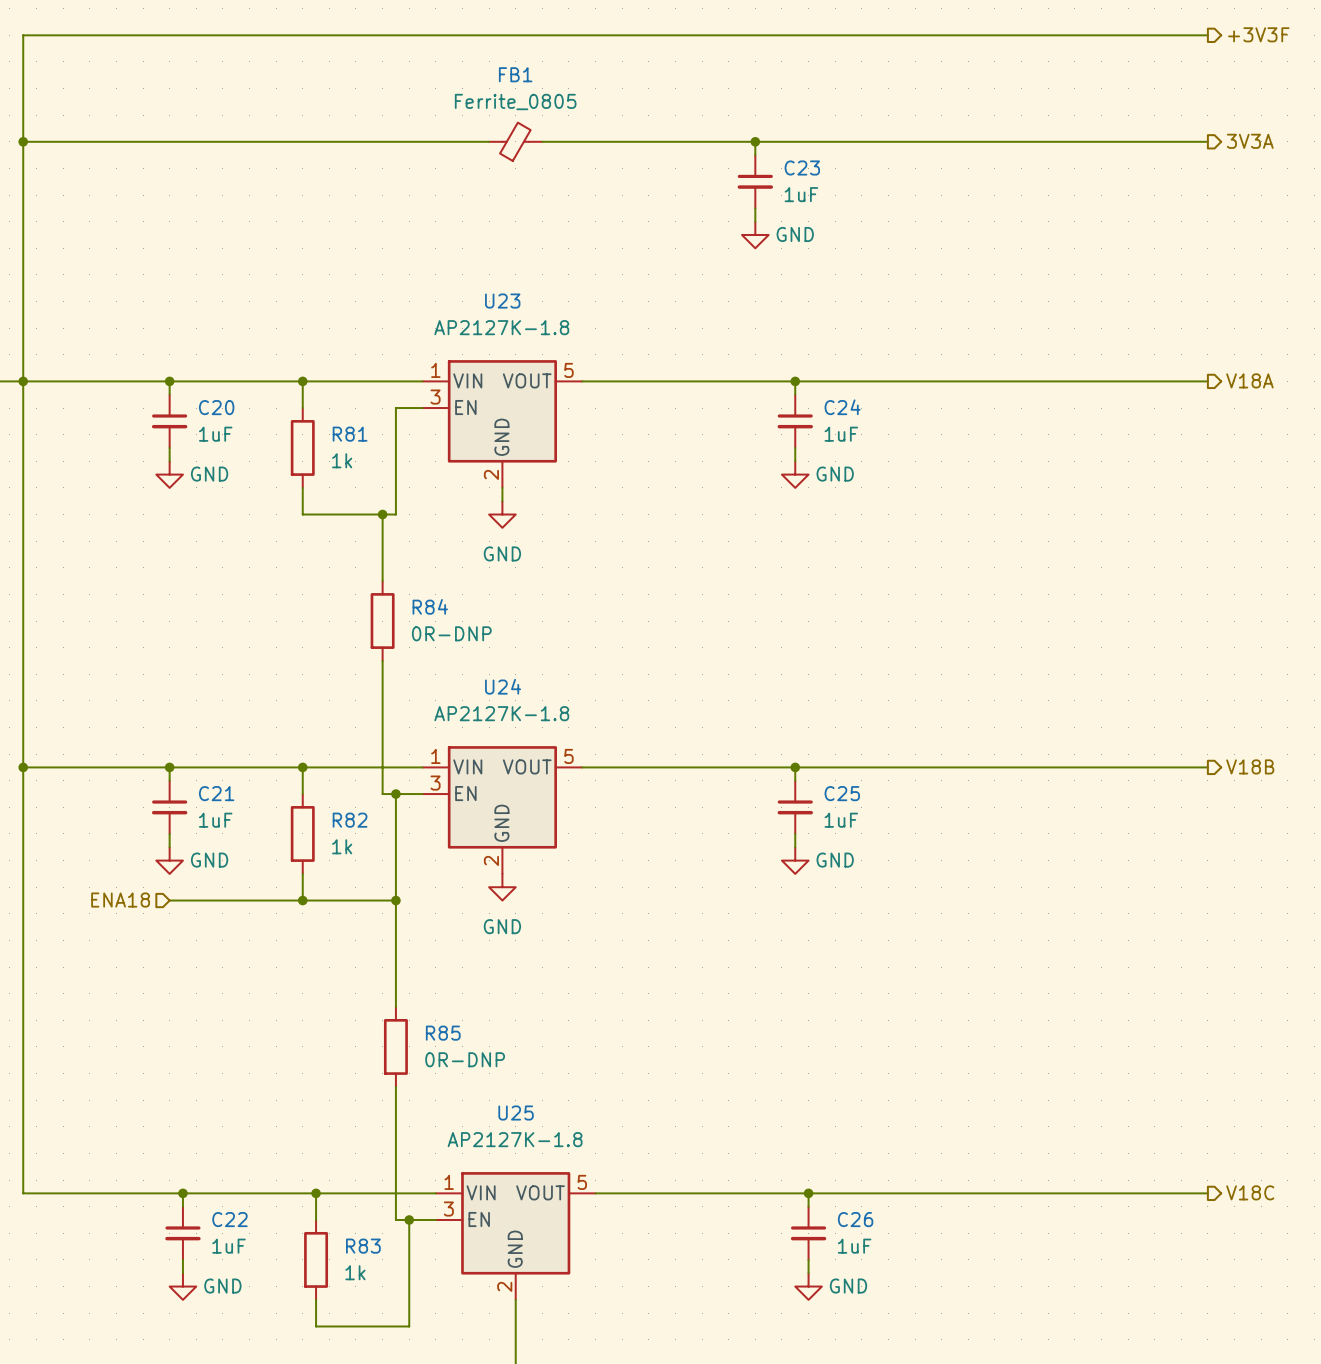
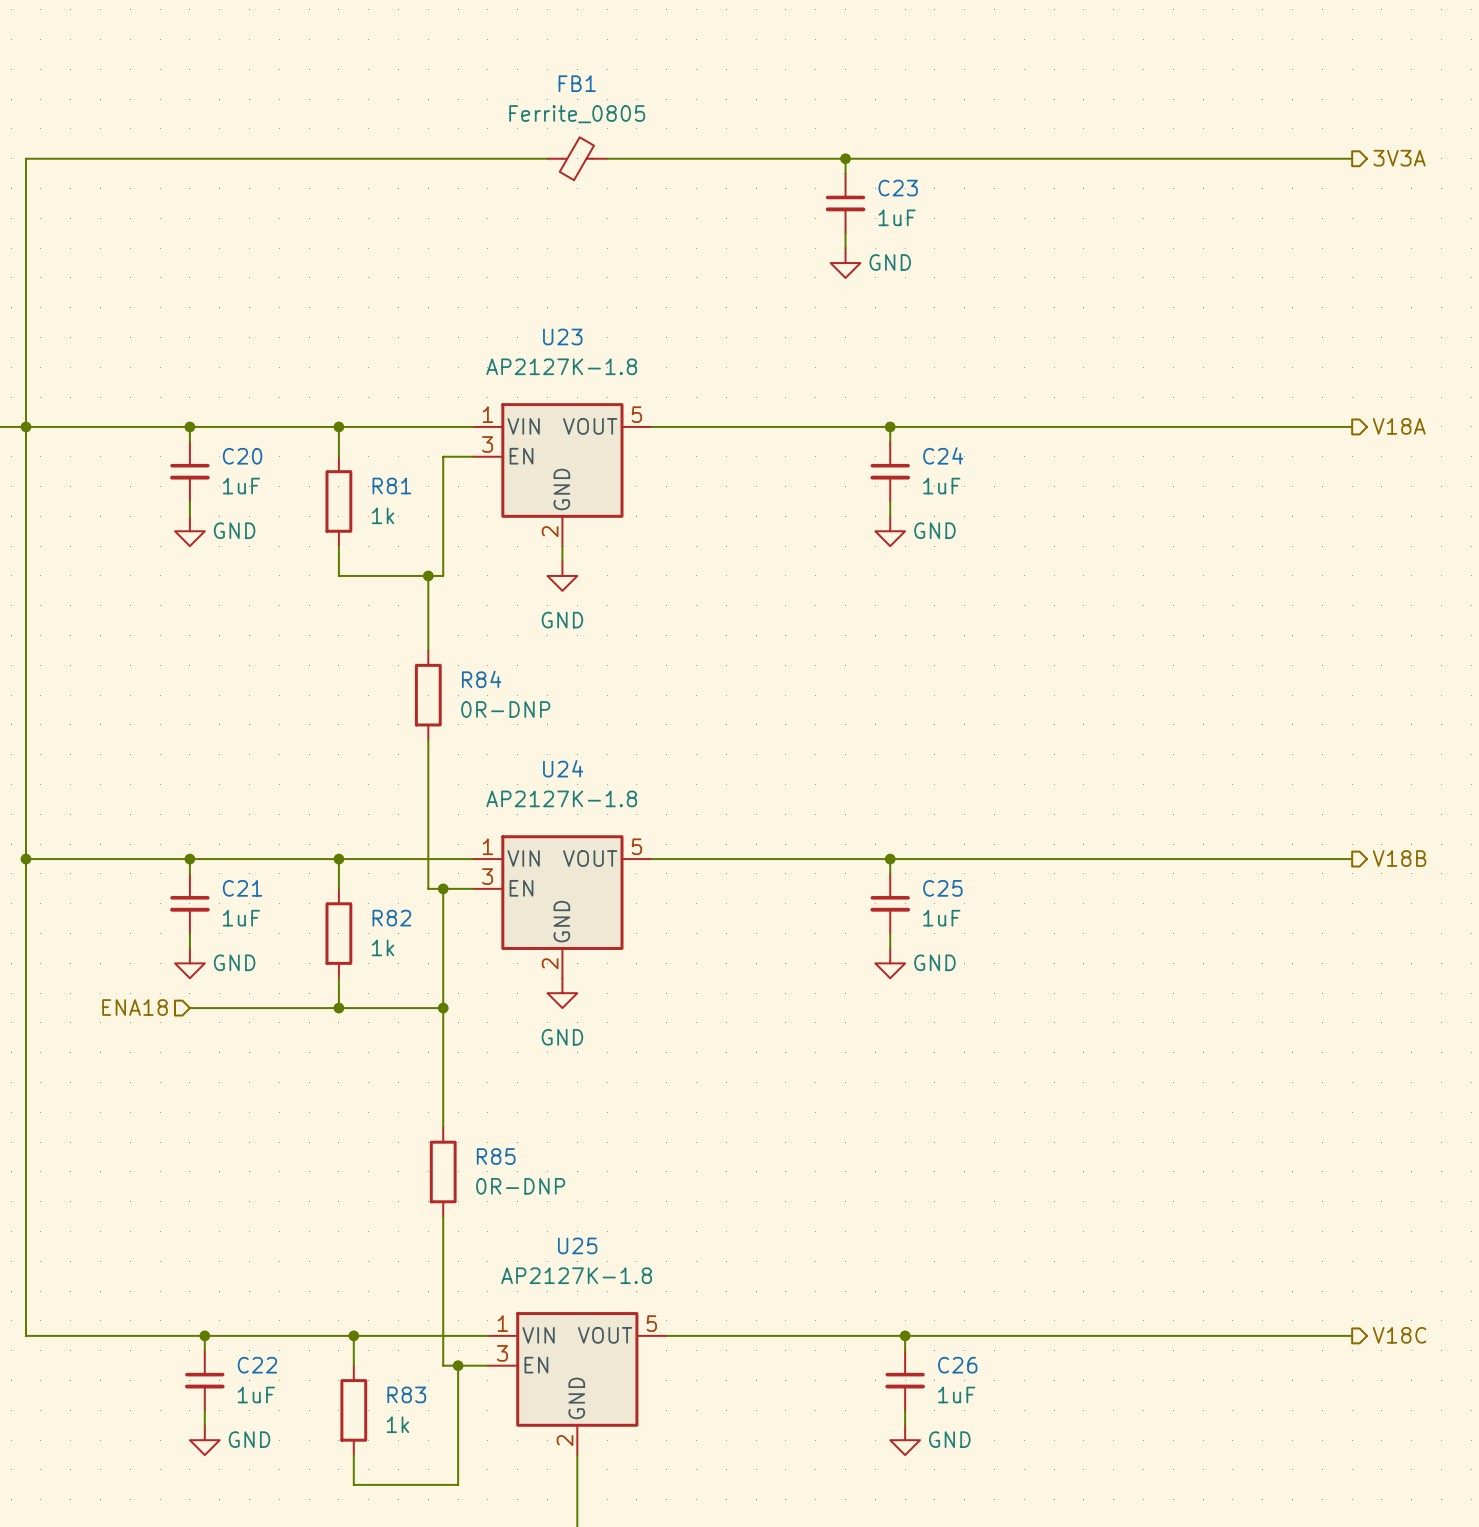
hierarchical label: +3V3F (1258, 34) -> none
wire: (1207, 35) (23, 35) (23, 141) -> none
junction: (23, 141) -> none

